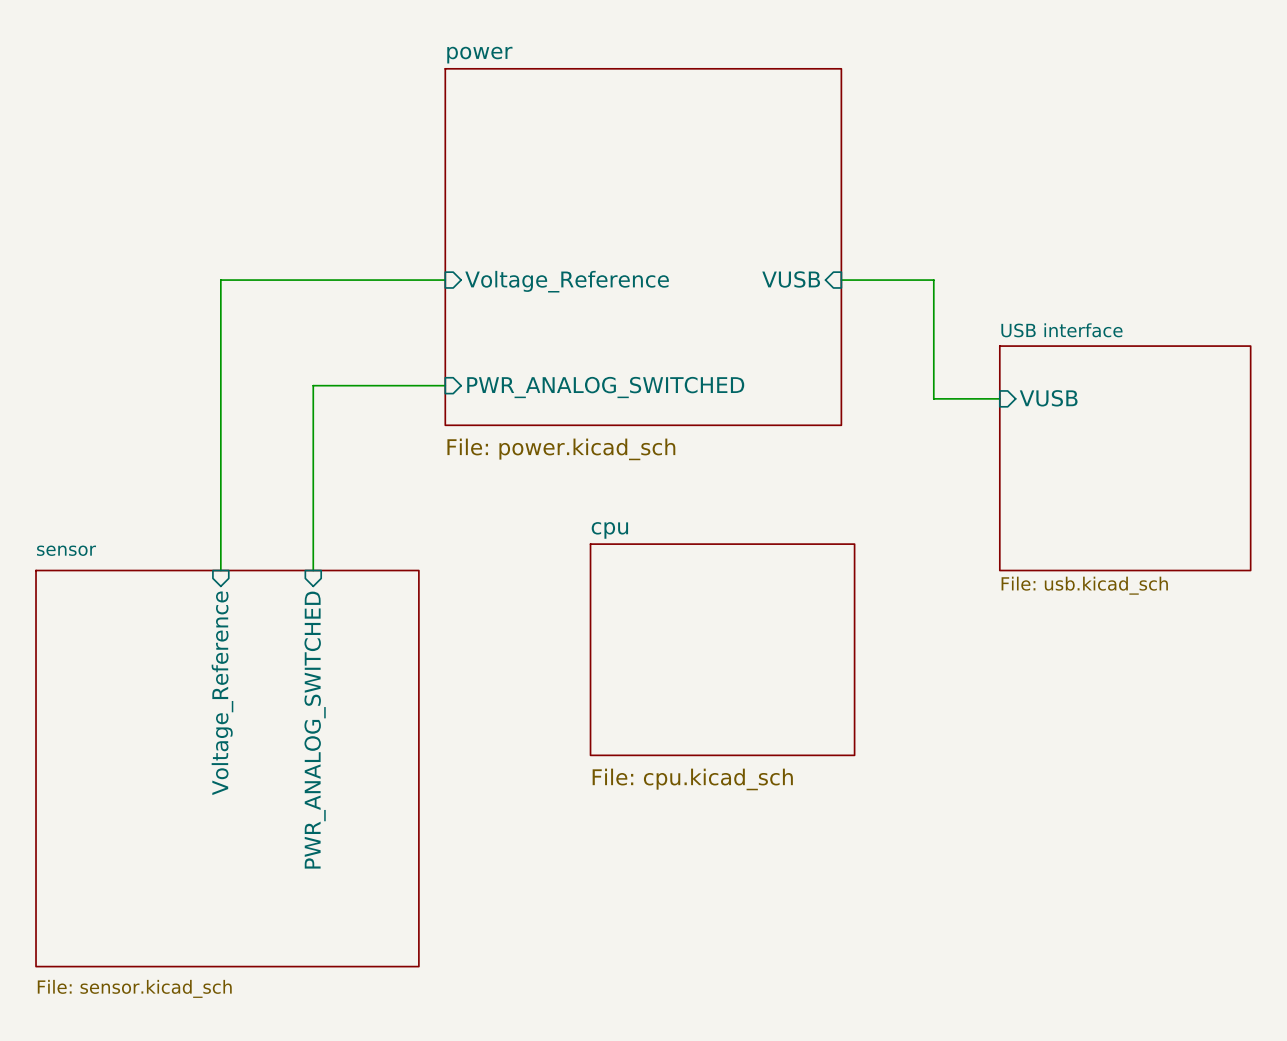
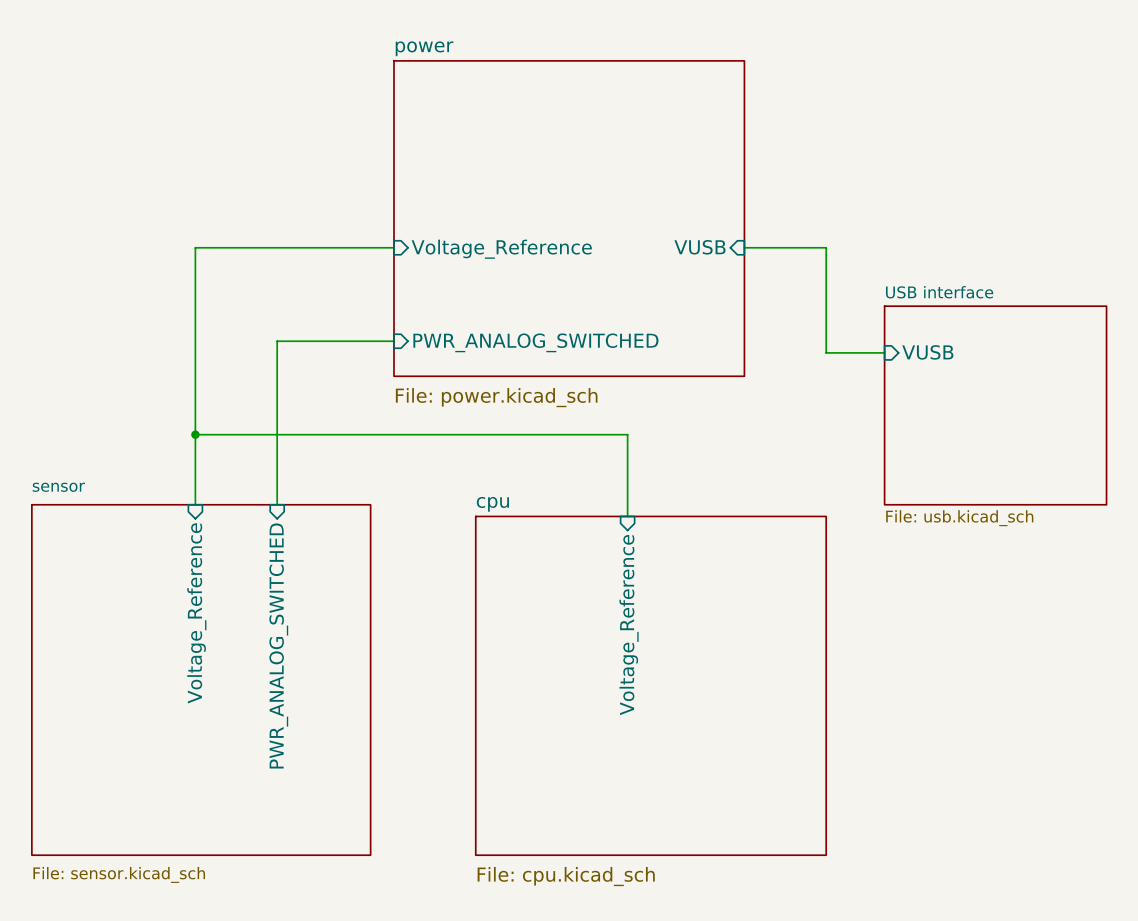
wire: none -> (195, 434) (627, 434) (627, 516)
junction: none -> (195, 434)
sheet cpu: File: cpu.kicad_sch (722, 649) -> none
sheet pin: none -> Voltage_Reference (629, 625)
sheet cpu: none -> File: cpu.kicad_sch (650, 685)

